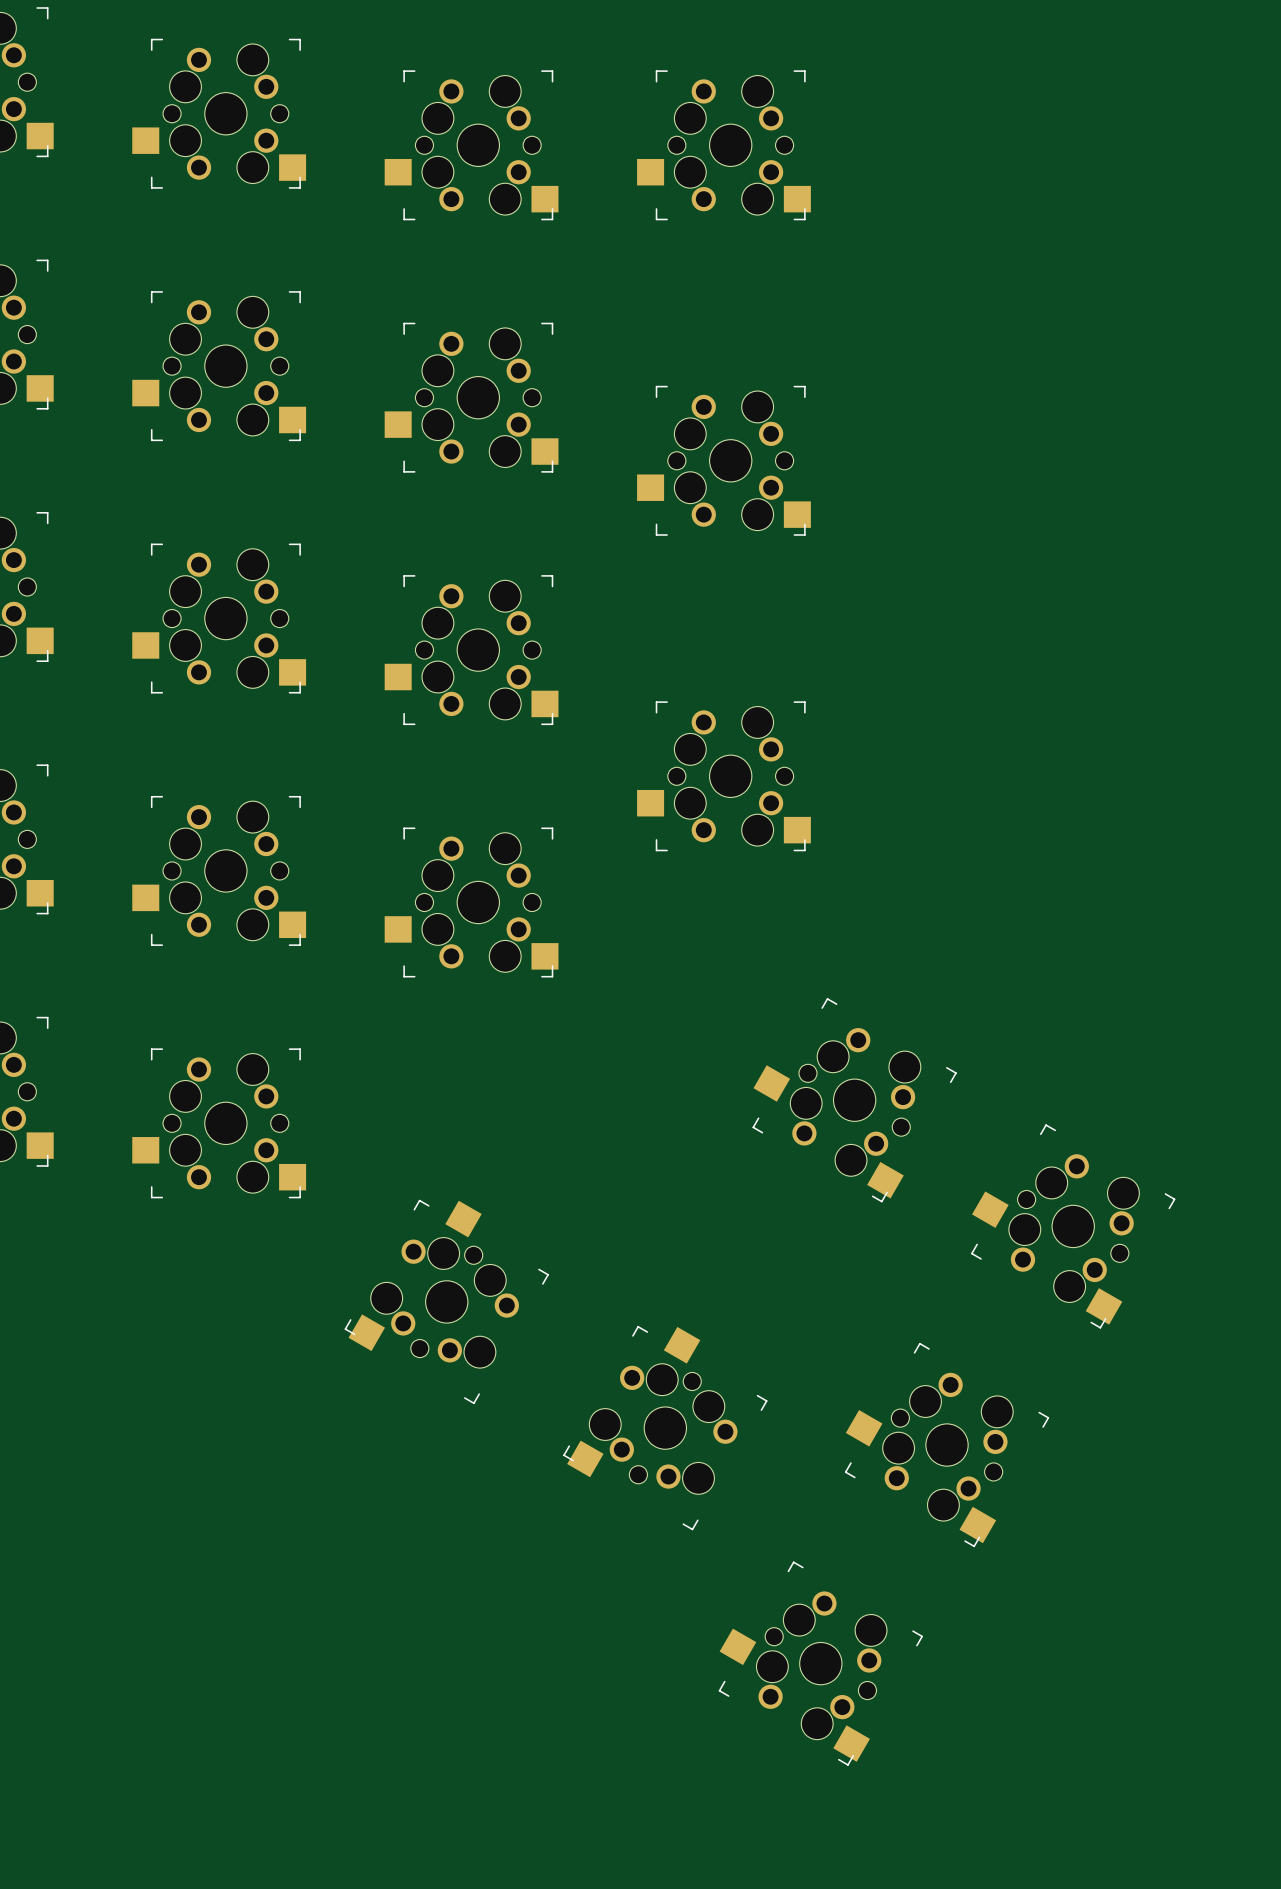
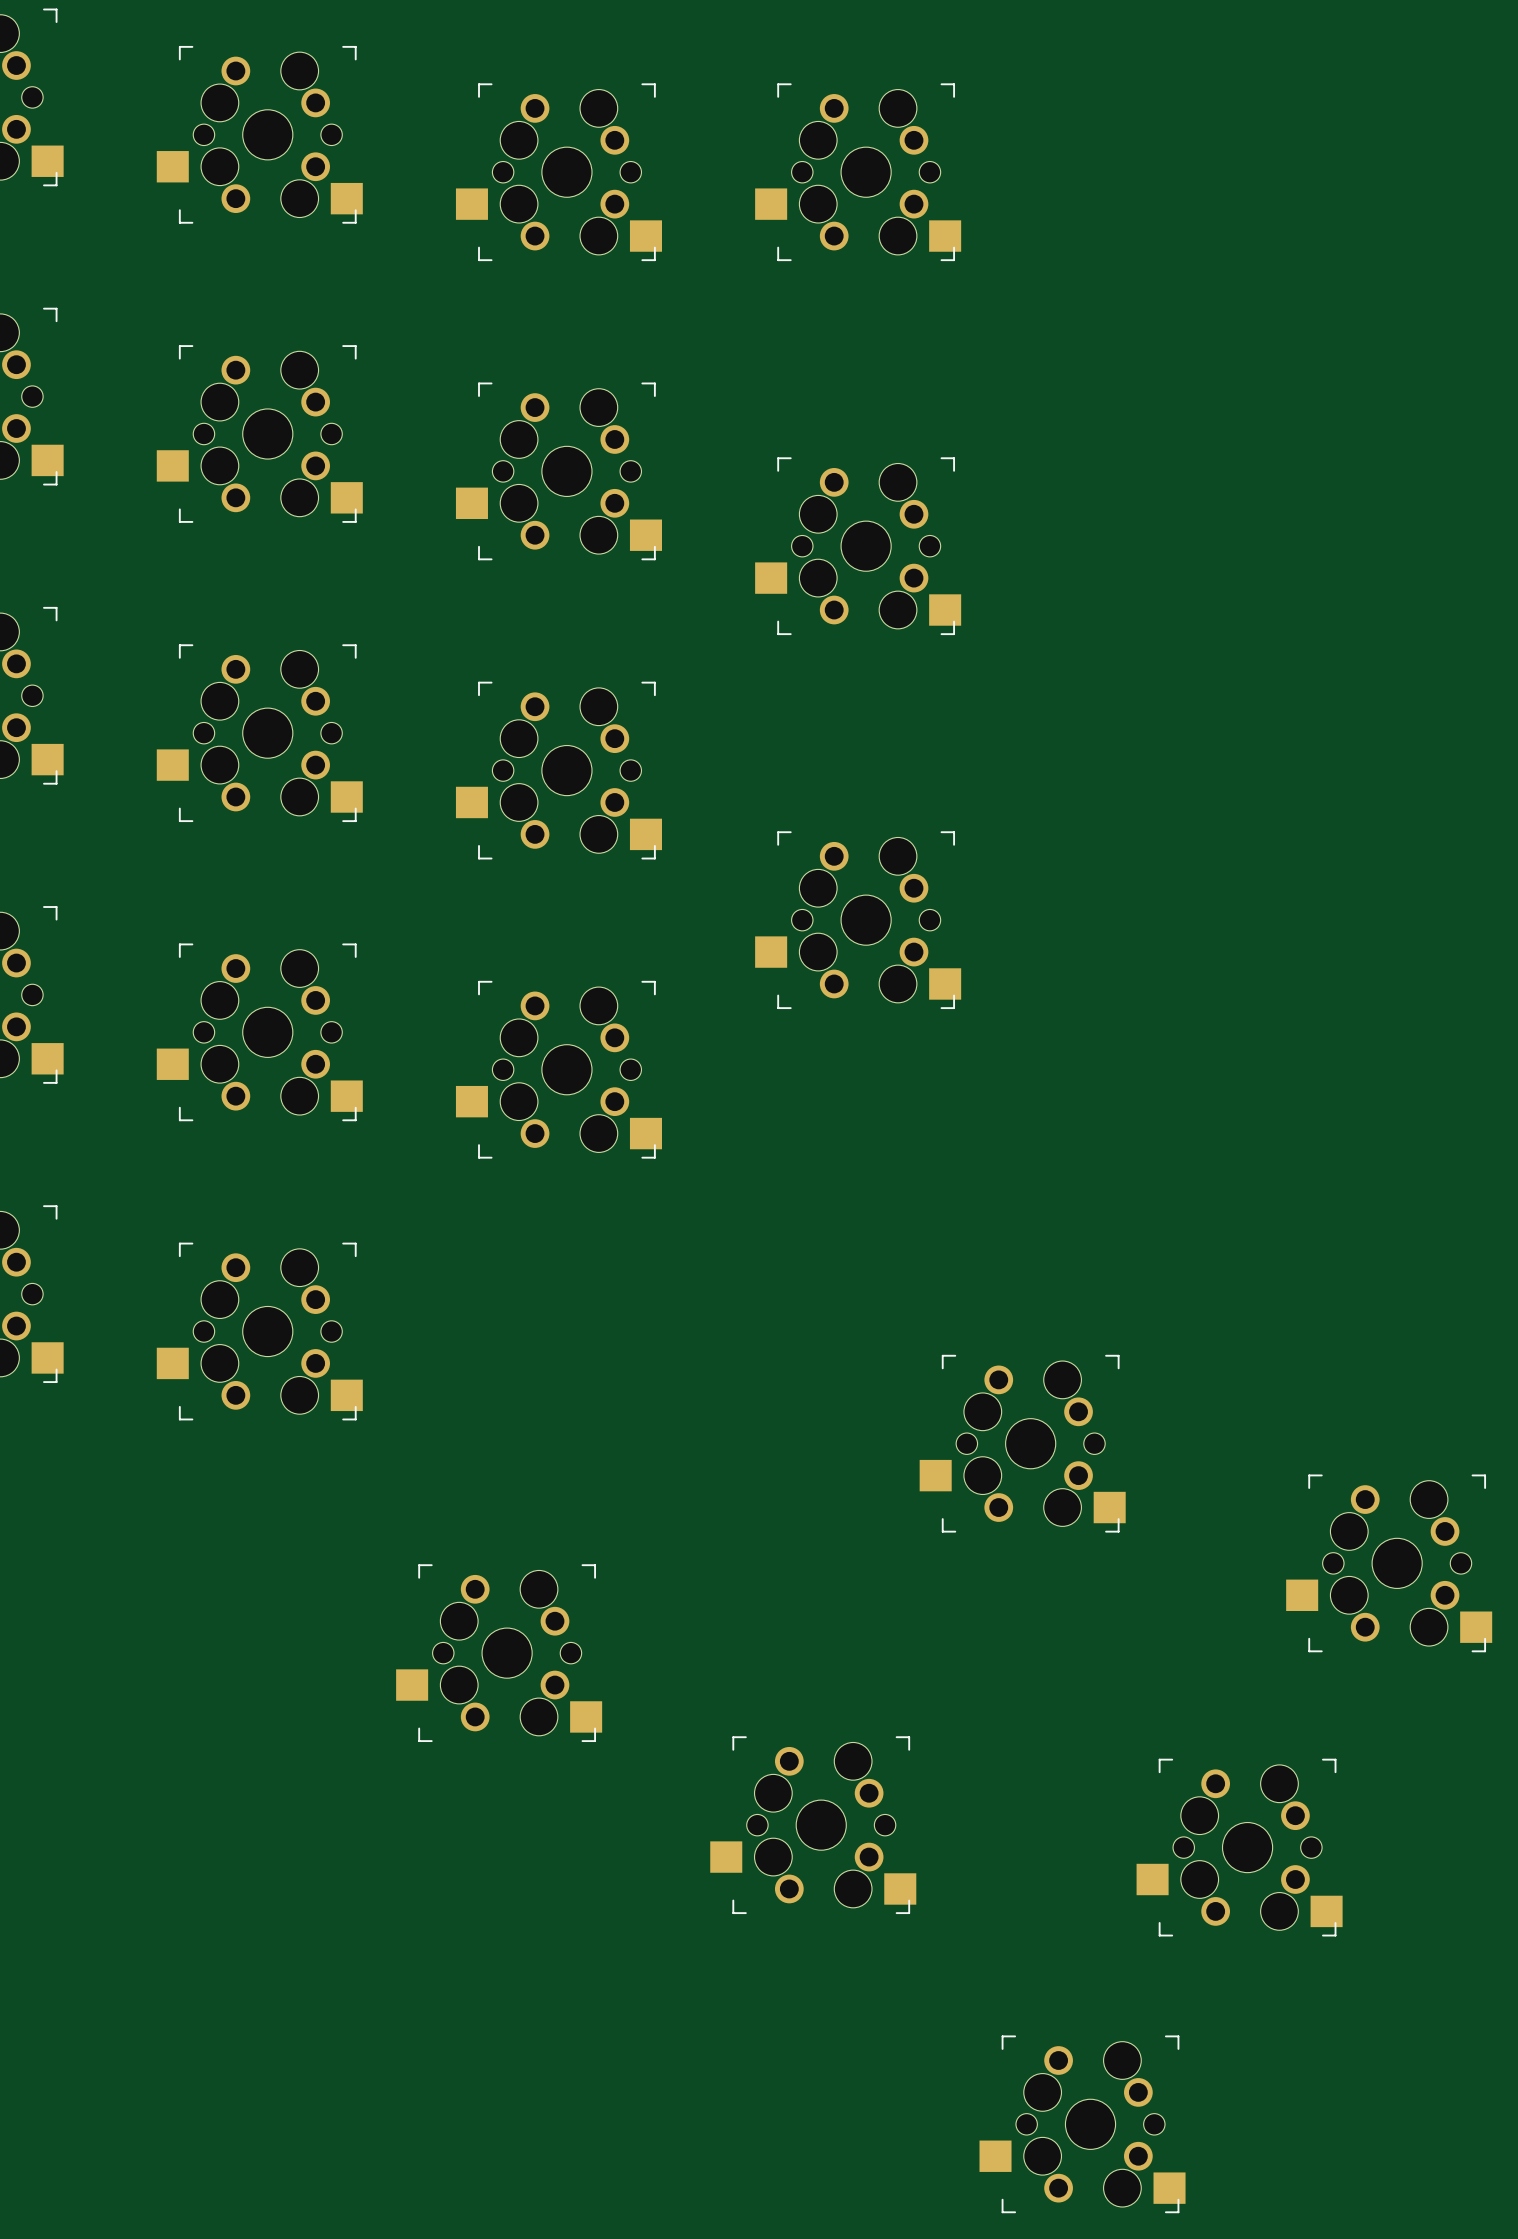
part: (854, 1100) -> none
part: none -> (1022, 1443)
part: (1073, 1226) -> none
part: (446, 1301) -> none
part: none -> (1389, 1563)
part: none -> (499, 1653)
part: (665, 1428) -> none
part: (947, 1445) -> none
part: none -> (813, 1825)
part: none -> (1239, 1847)
part: (820, 1663) -> none
part: none -> (1082, 2124)

